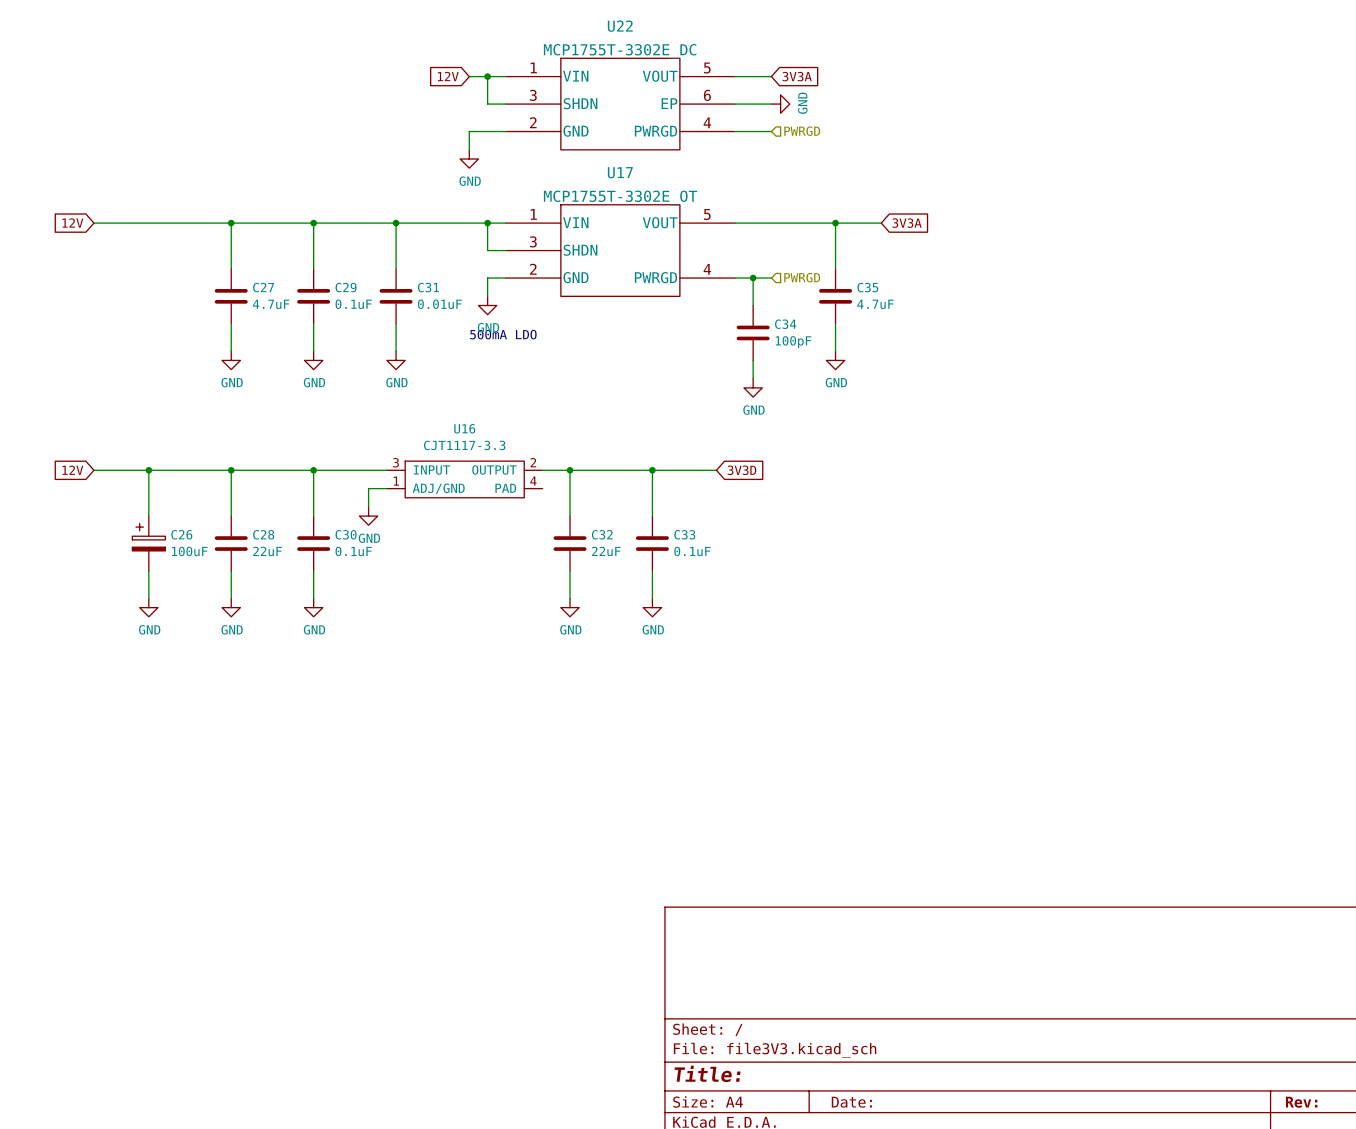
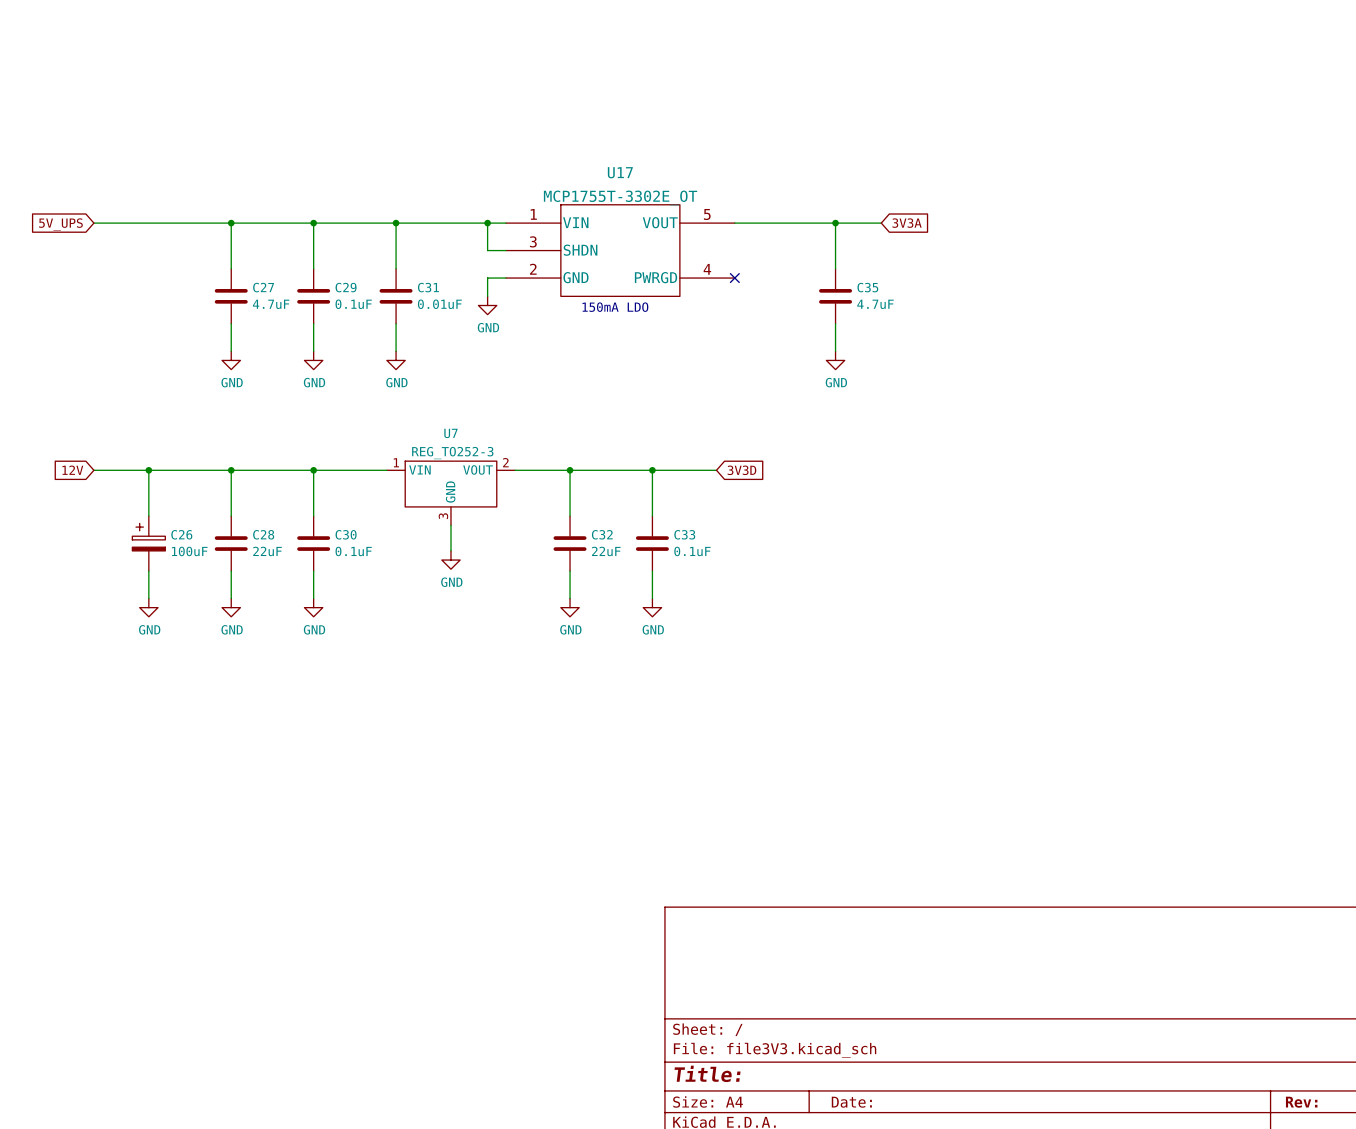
global label: 12V (448, 76) -> none
wire: (469, 76) (505, 76) -> none
wire: (487, 76) (487, 104) (505, 104) -> none
junction: (487, 76) -> none
wire: (734, 76) (771, 76) -> none
global label: 3V3A (797, 76) -> none
U22: MCP1755T-3302E_DC (620, 104) -> none
wire: (734, 104) (771, 104) -> none
power symbol: GND (780, 104) -> none
wire: (505, 131) (469, 131) (469, 149) -> none
wire: (734, 131) (771, 131) -> none
hierarchical label: PWRGD (802, 131) -> none
power symbol: GND (469, 159) -> none
global label: 12V (72, 223) -> 5V_UPS (60, 224)
hierarchical label: PWRGD (802, 277) -> none
wire: (734, 278) (771, 278) -> none
no-connect mark: none -> (734, 278)
wire: (753, 278) (753, 305) -> none
junction: (753, 278) -> none
text: none -> 150mA LDO (615, 307)
C34: 100pF (753, 332) -> none
text: 500mA LDO (503, 334) -> none
wire: (753, 360) (753, 378) -> none
power symbol: GND (753, 387) -> none
U7: none -> REG_TO252-3 (538, 410)
U16: CJT1117-3.3 (464, 479) -> none
wire: (386, 488) (368, 488) (368, 506) -> none
power symbol position: GND (368, 516) -> GND (450, 560)
wire: none -> (450, 525) (450, 550)

